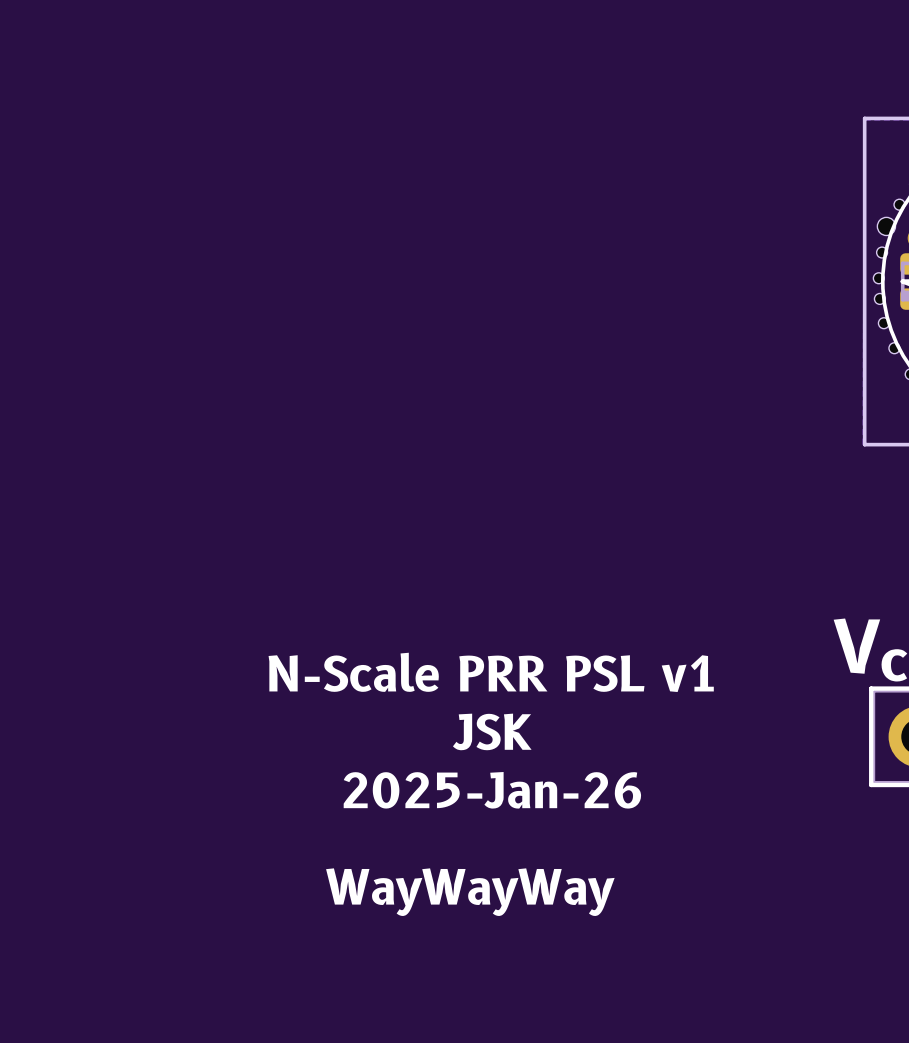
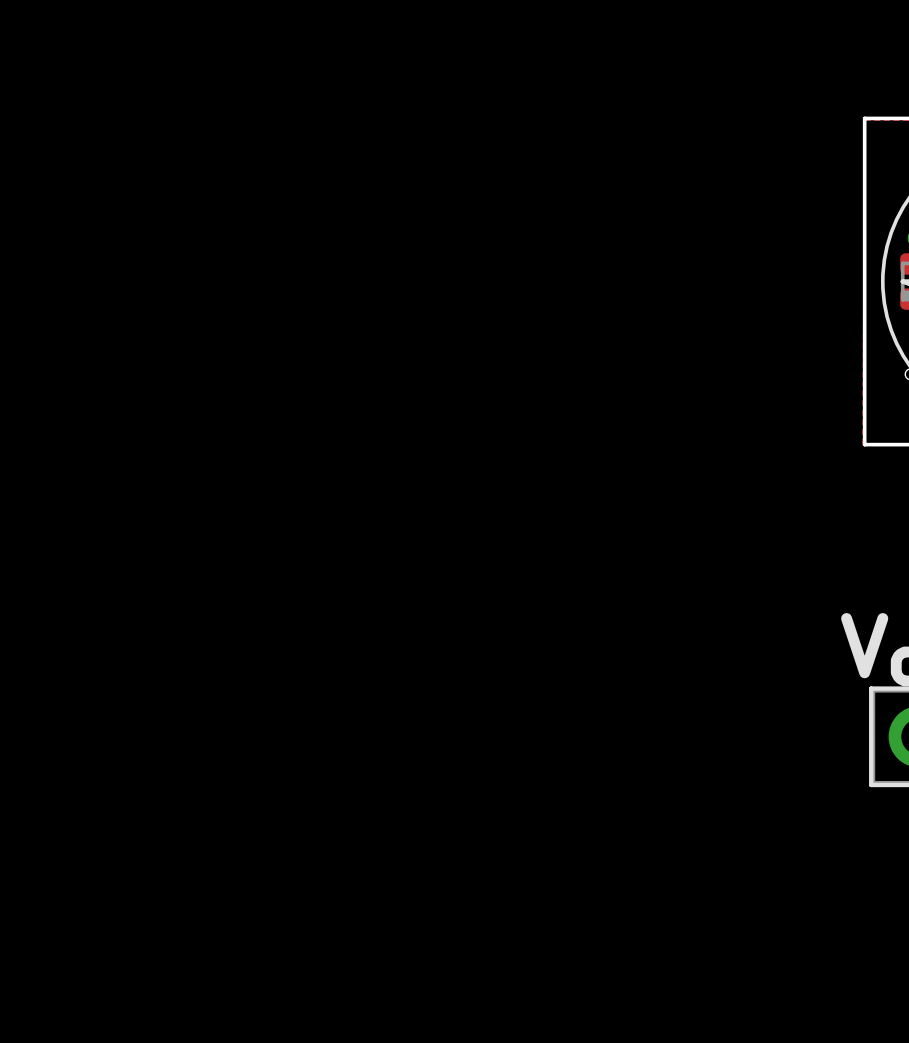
part: (899, 204) -> none
part: (886, 226) -> none
part: (882, 252) -> none
part: (878, 278) -> none
part: (879, 298) -> none
part: (883, 323) -> none
part: (894, 348) -> none
text: N-Scale PRR PSL v1 (491, 672) -> none
text: JSK (492, 731) -> none
text: 2025-Jan-26 (492, 790) -> none
text: WayWayWay (470, 892) -> none

